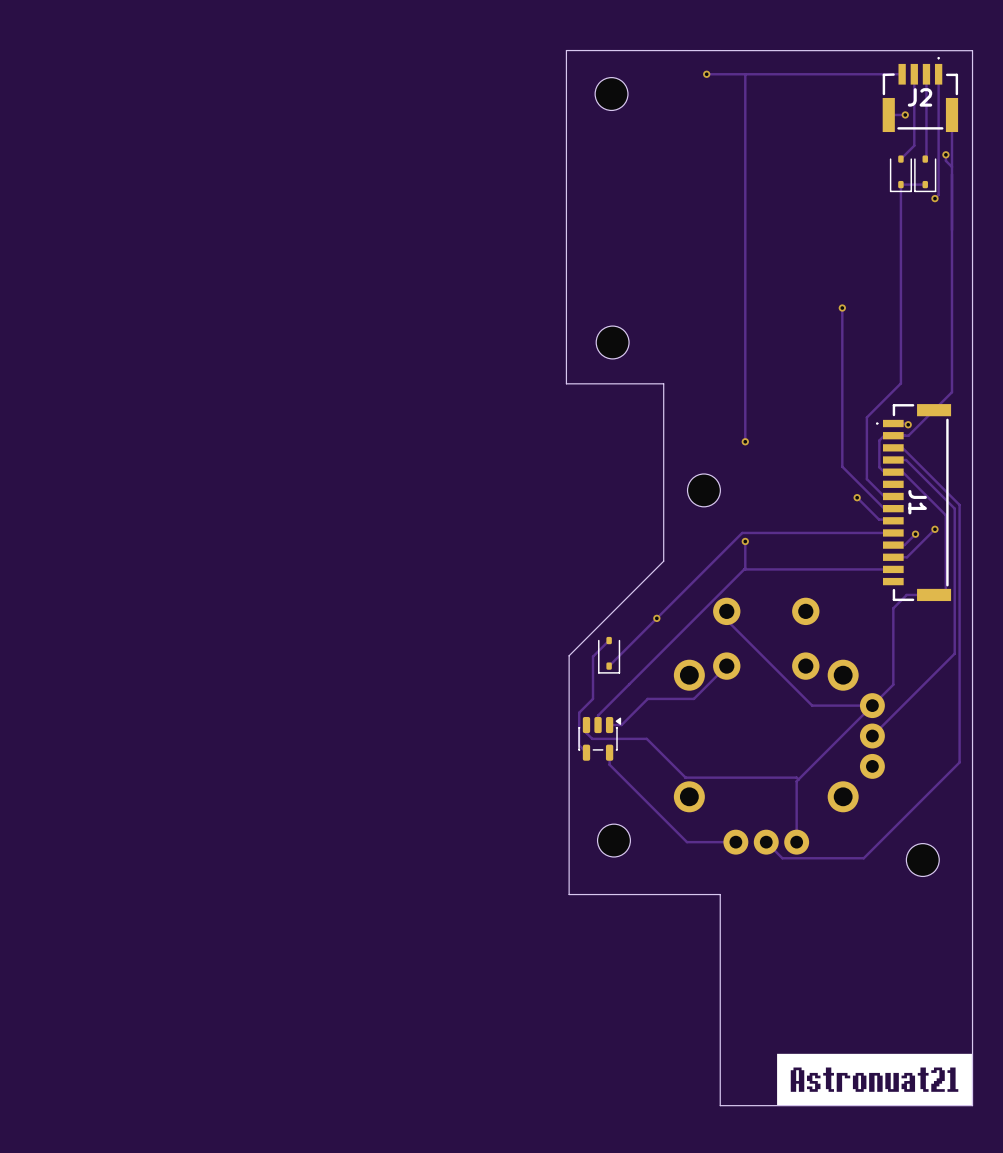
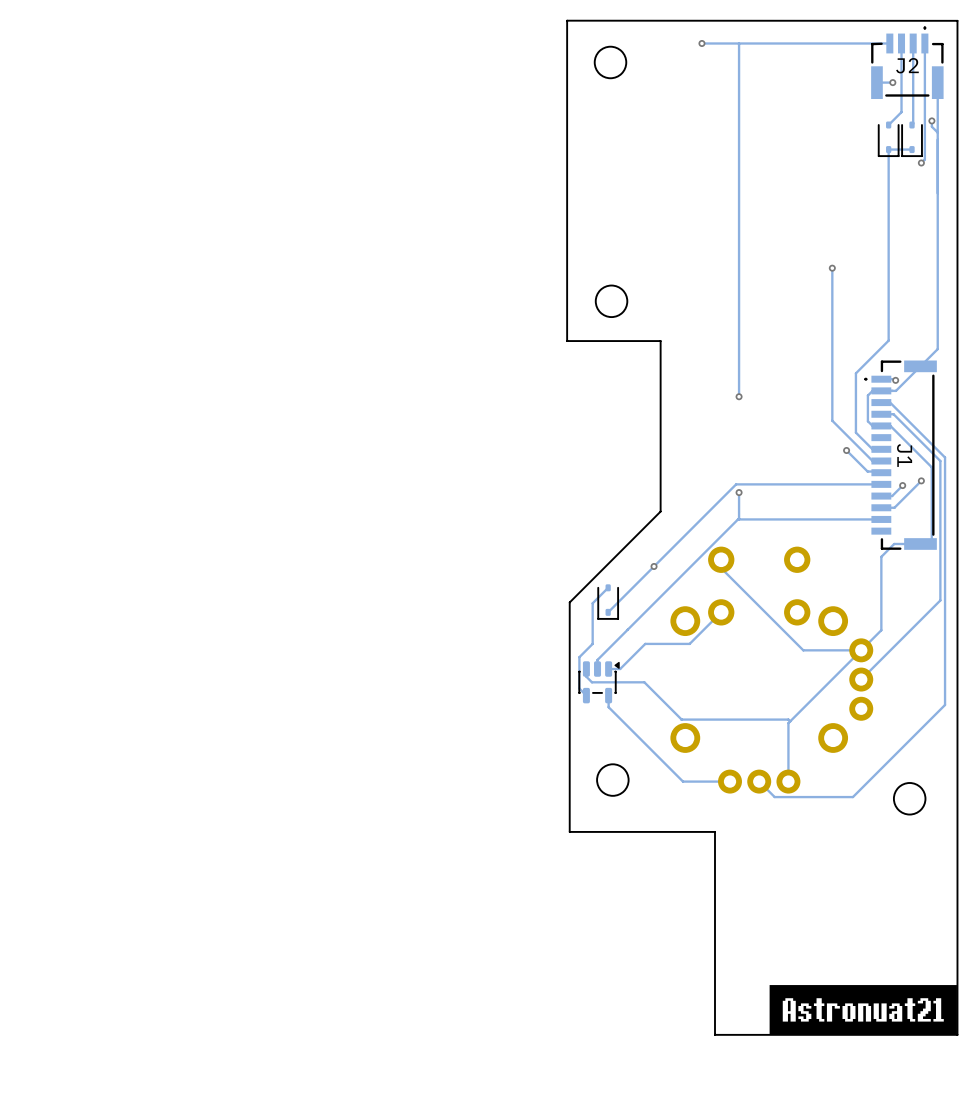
part: (703, 490) -> none

